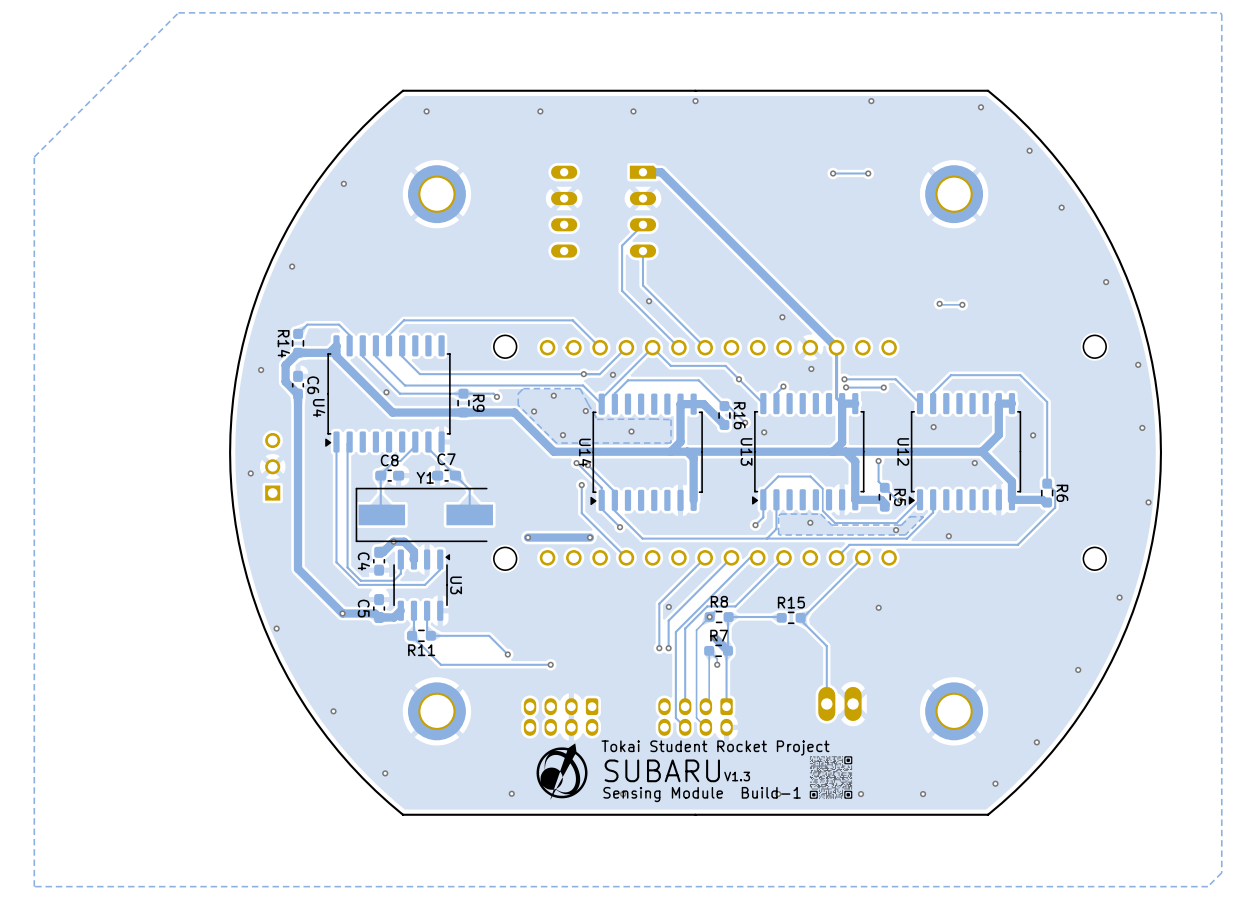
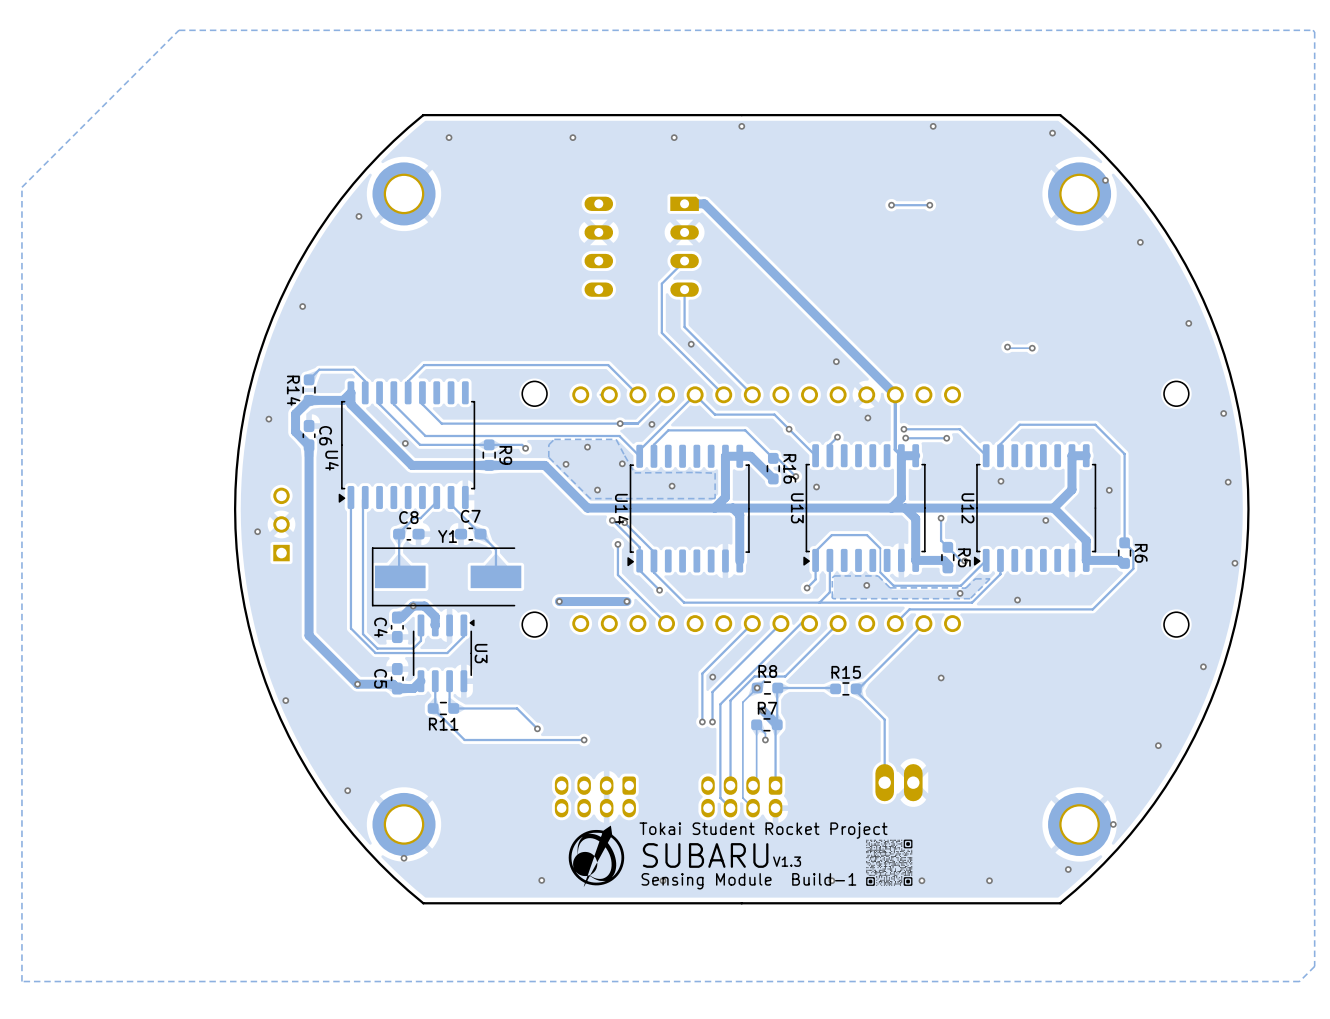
part position: (436, 194) -> (404, 193)
part position: (954, 194) -> (1079, 193)
part position: (436, 711) -> (404, 824)
part position: (954, 711) -> (1079, 824)

